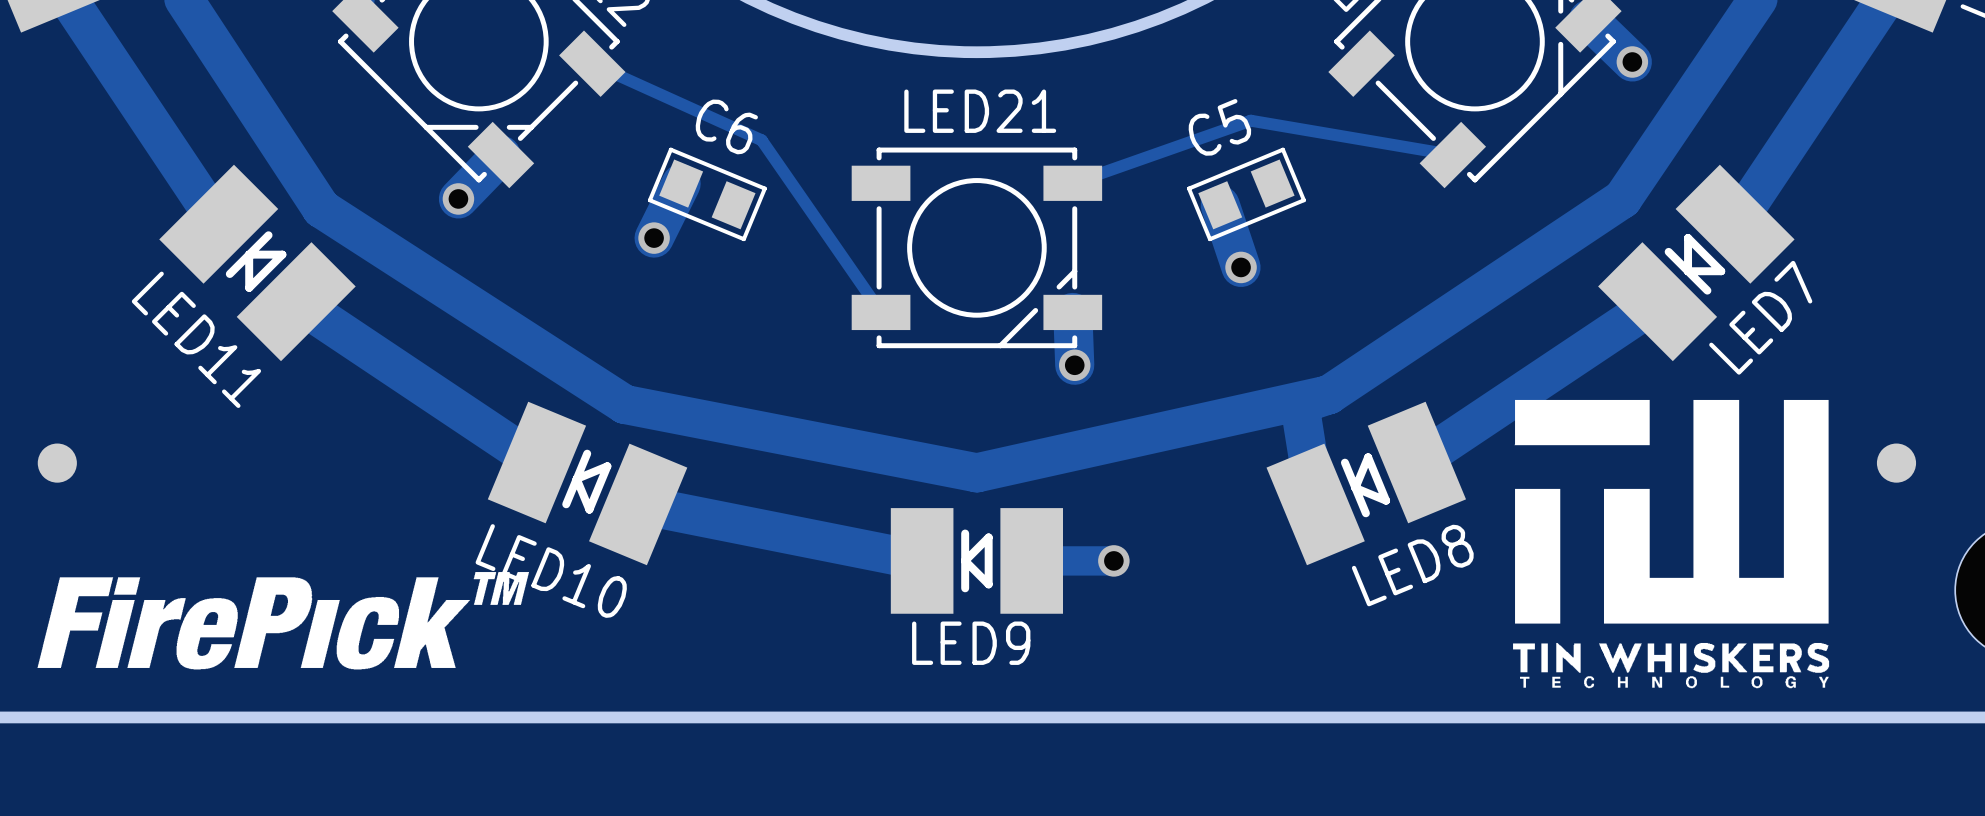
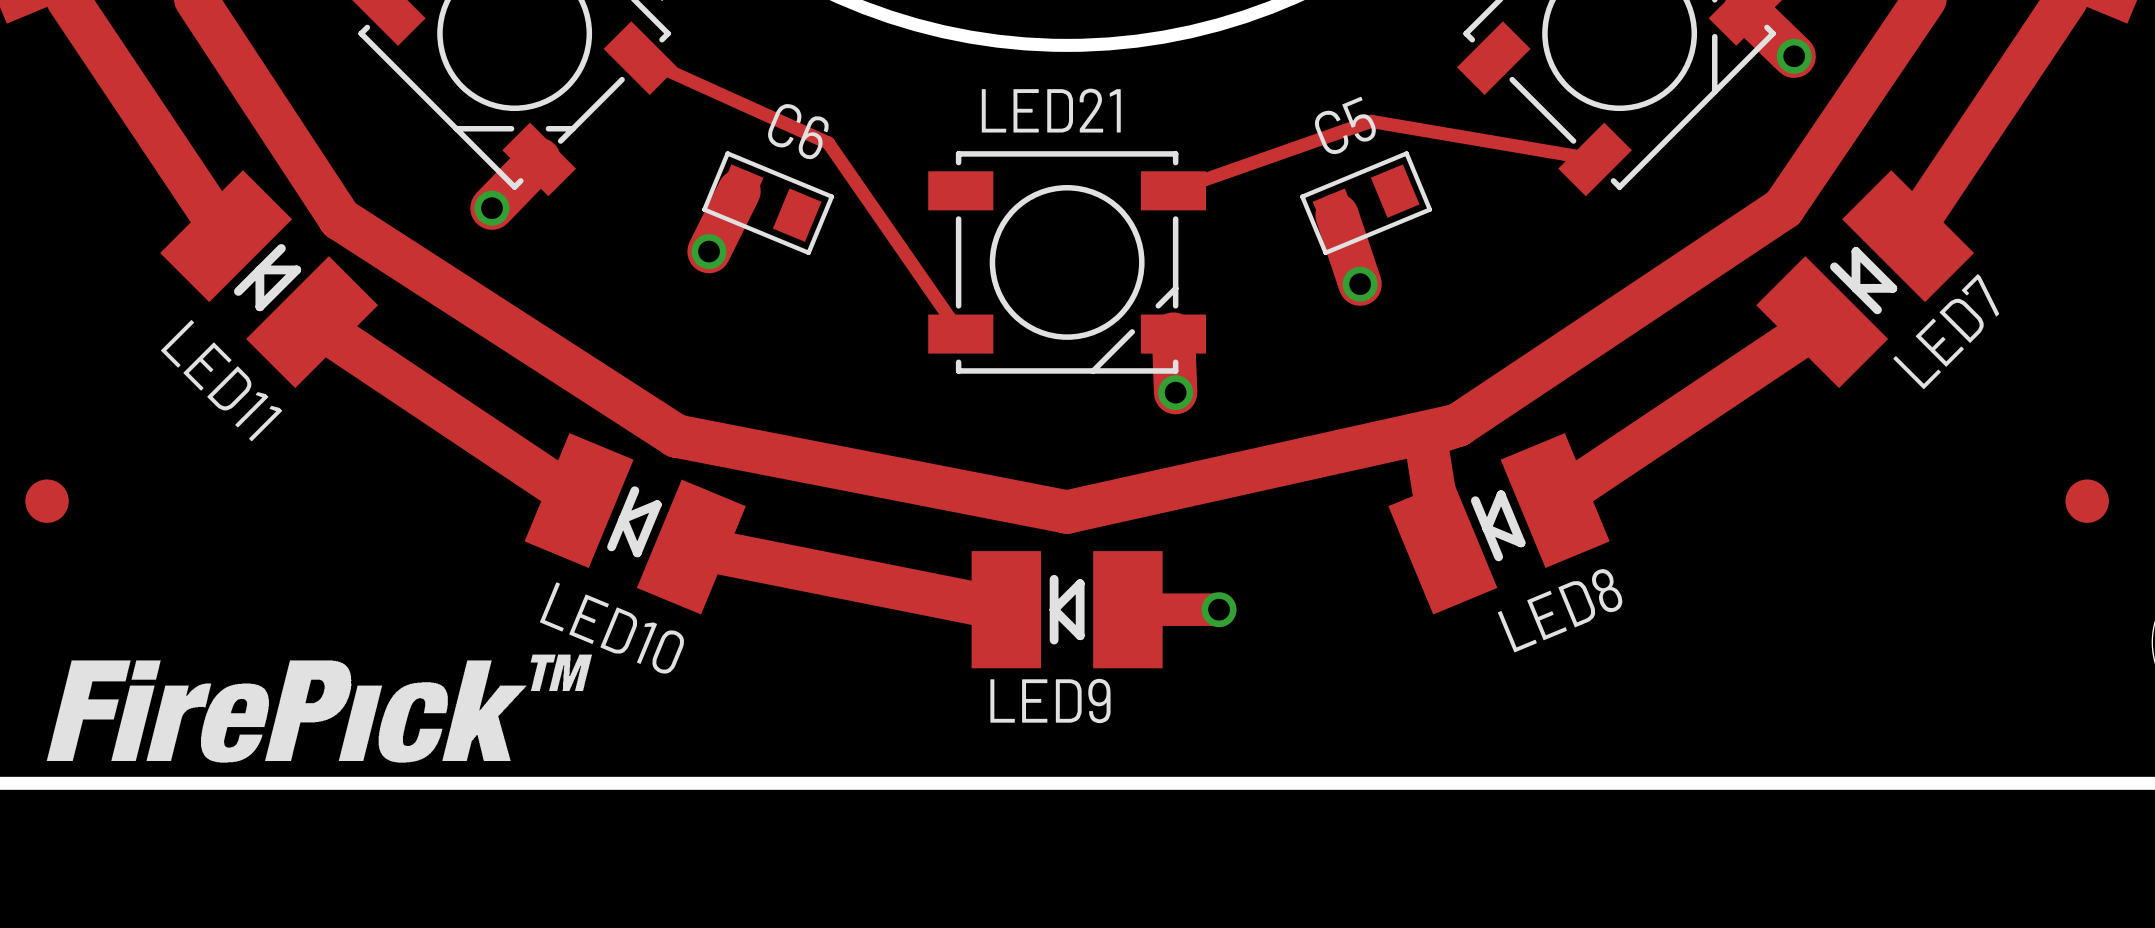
drawing: [1513, 399, 1830, 689] -> none
drawing position: (283, 620) -> (319, 708)

